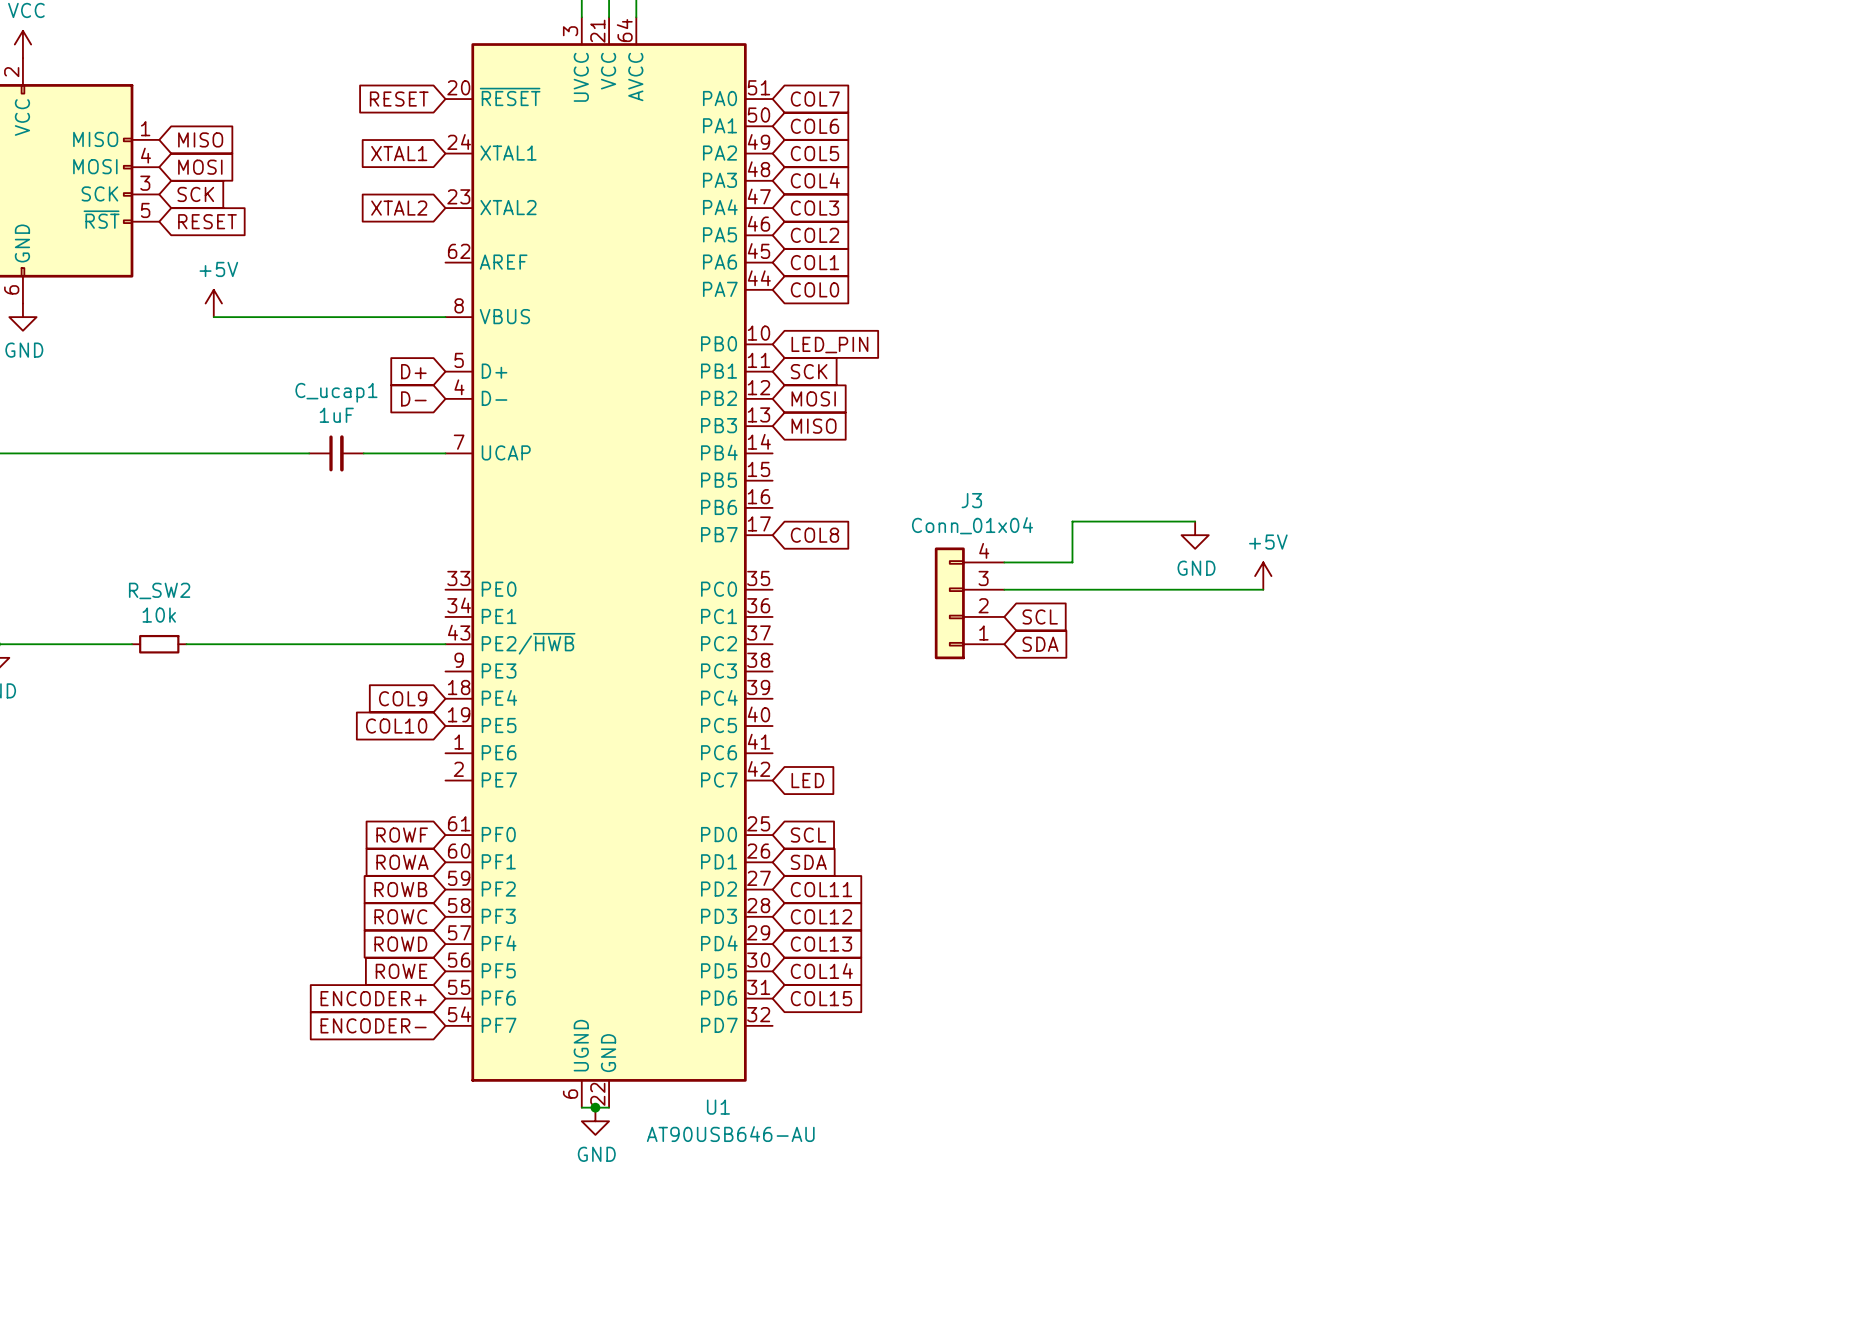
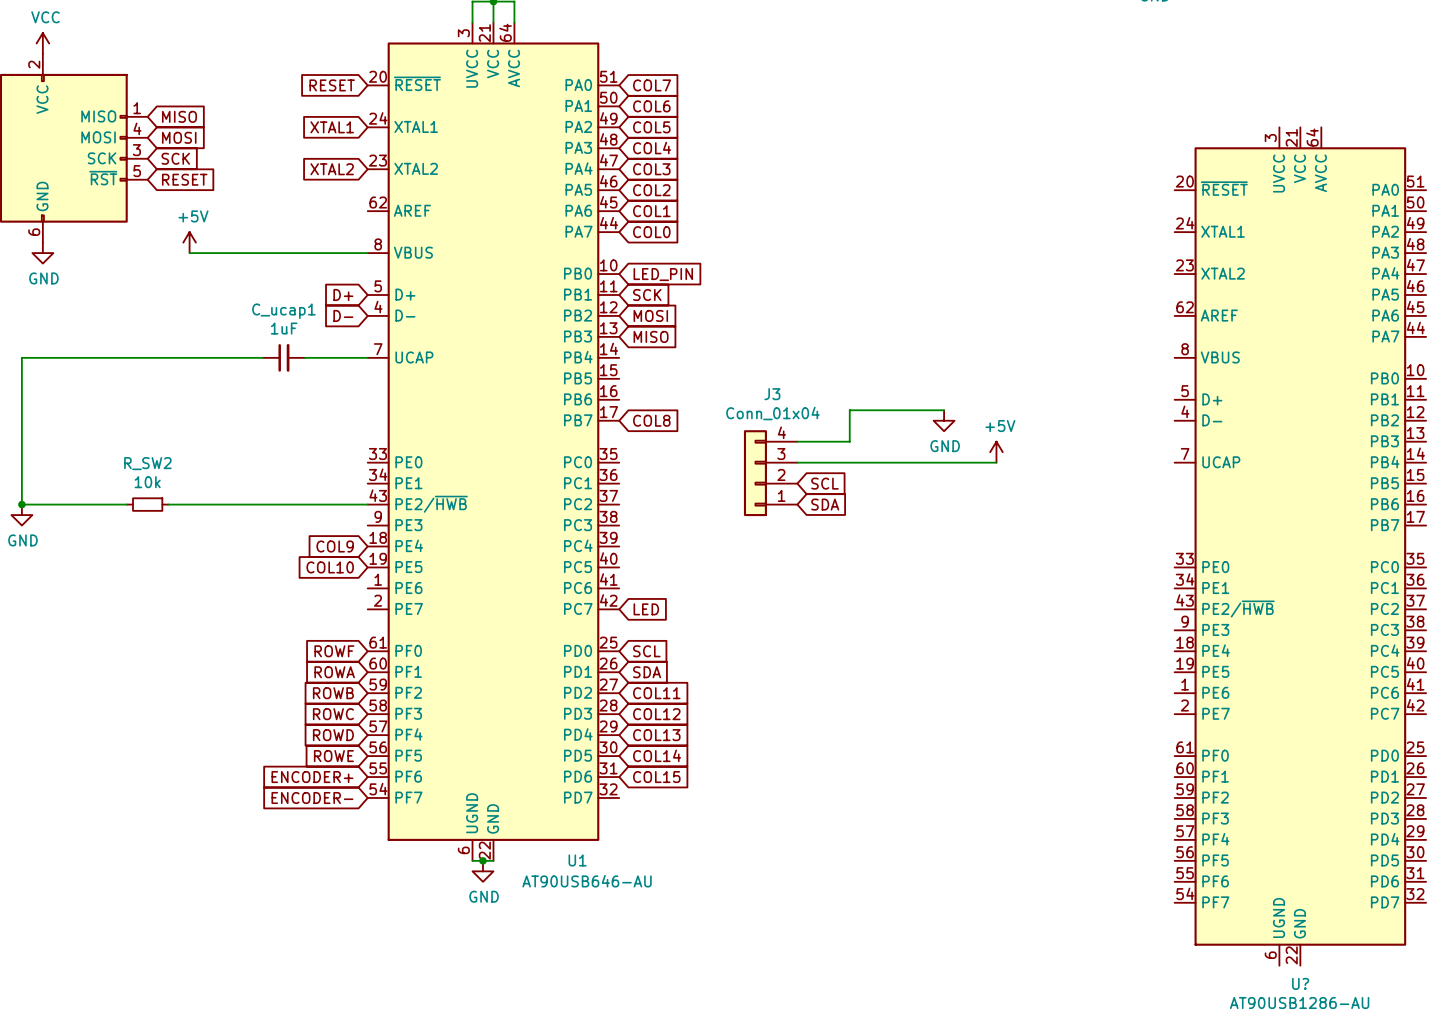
U?: none -> AT90USB1286-AU (1300, 546)

